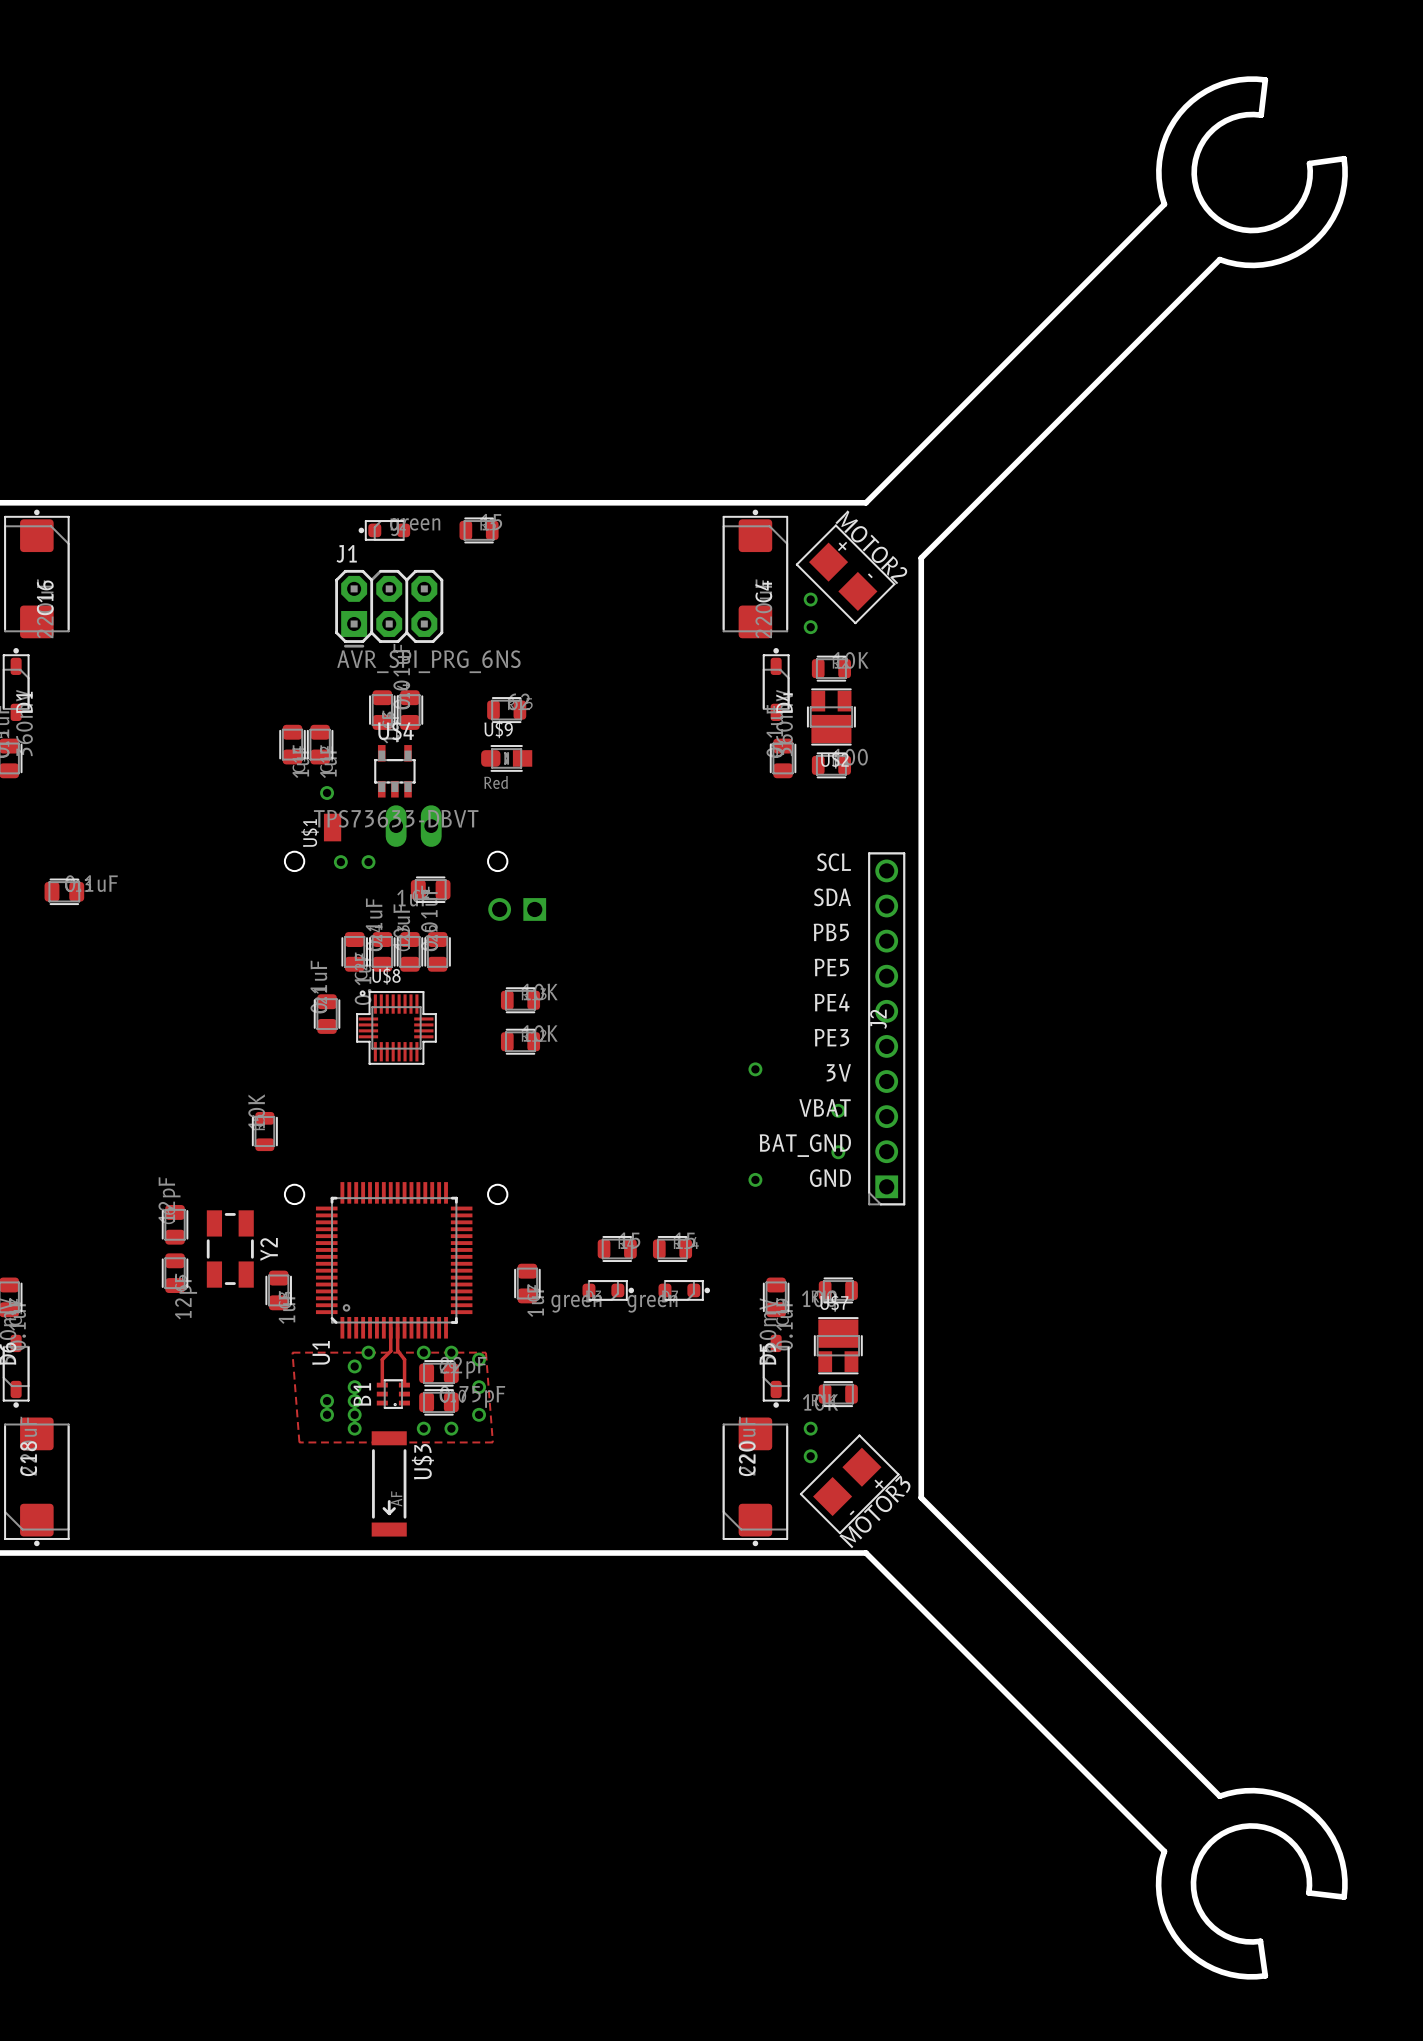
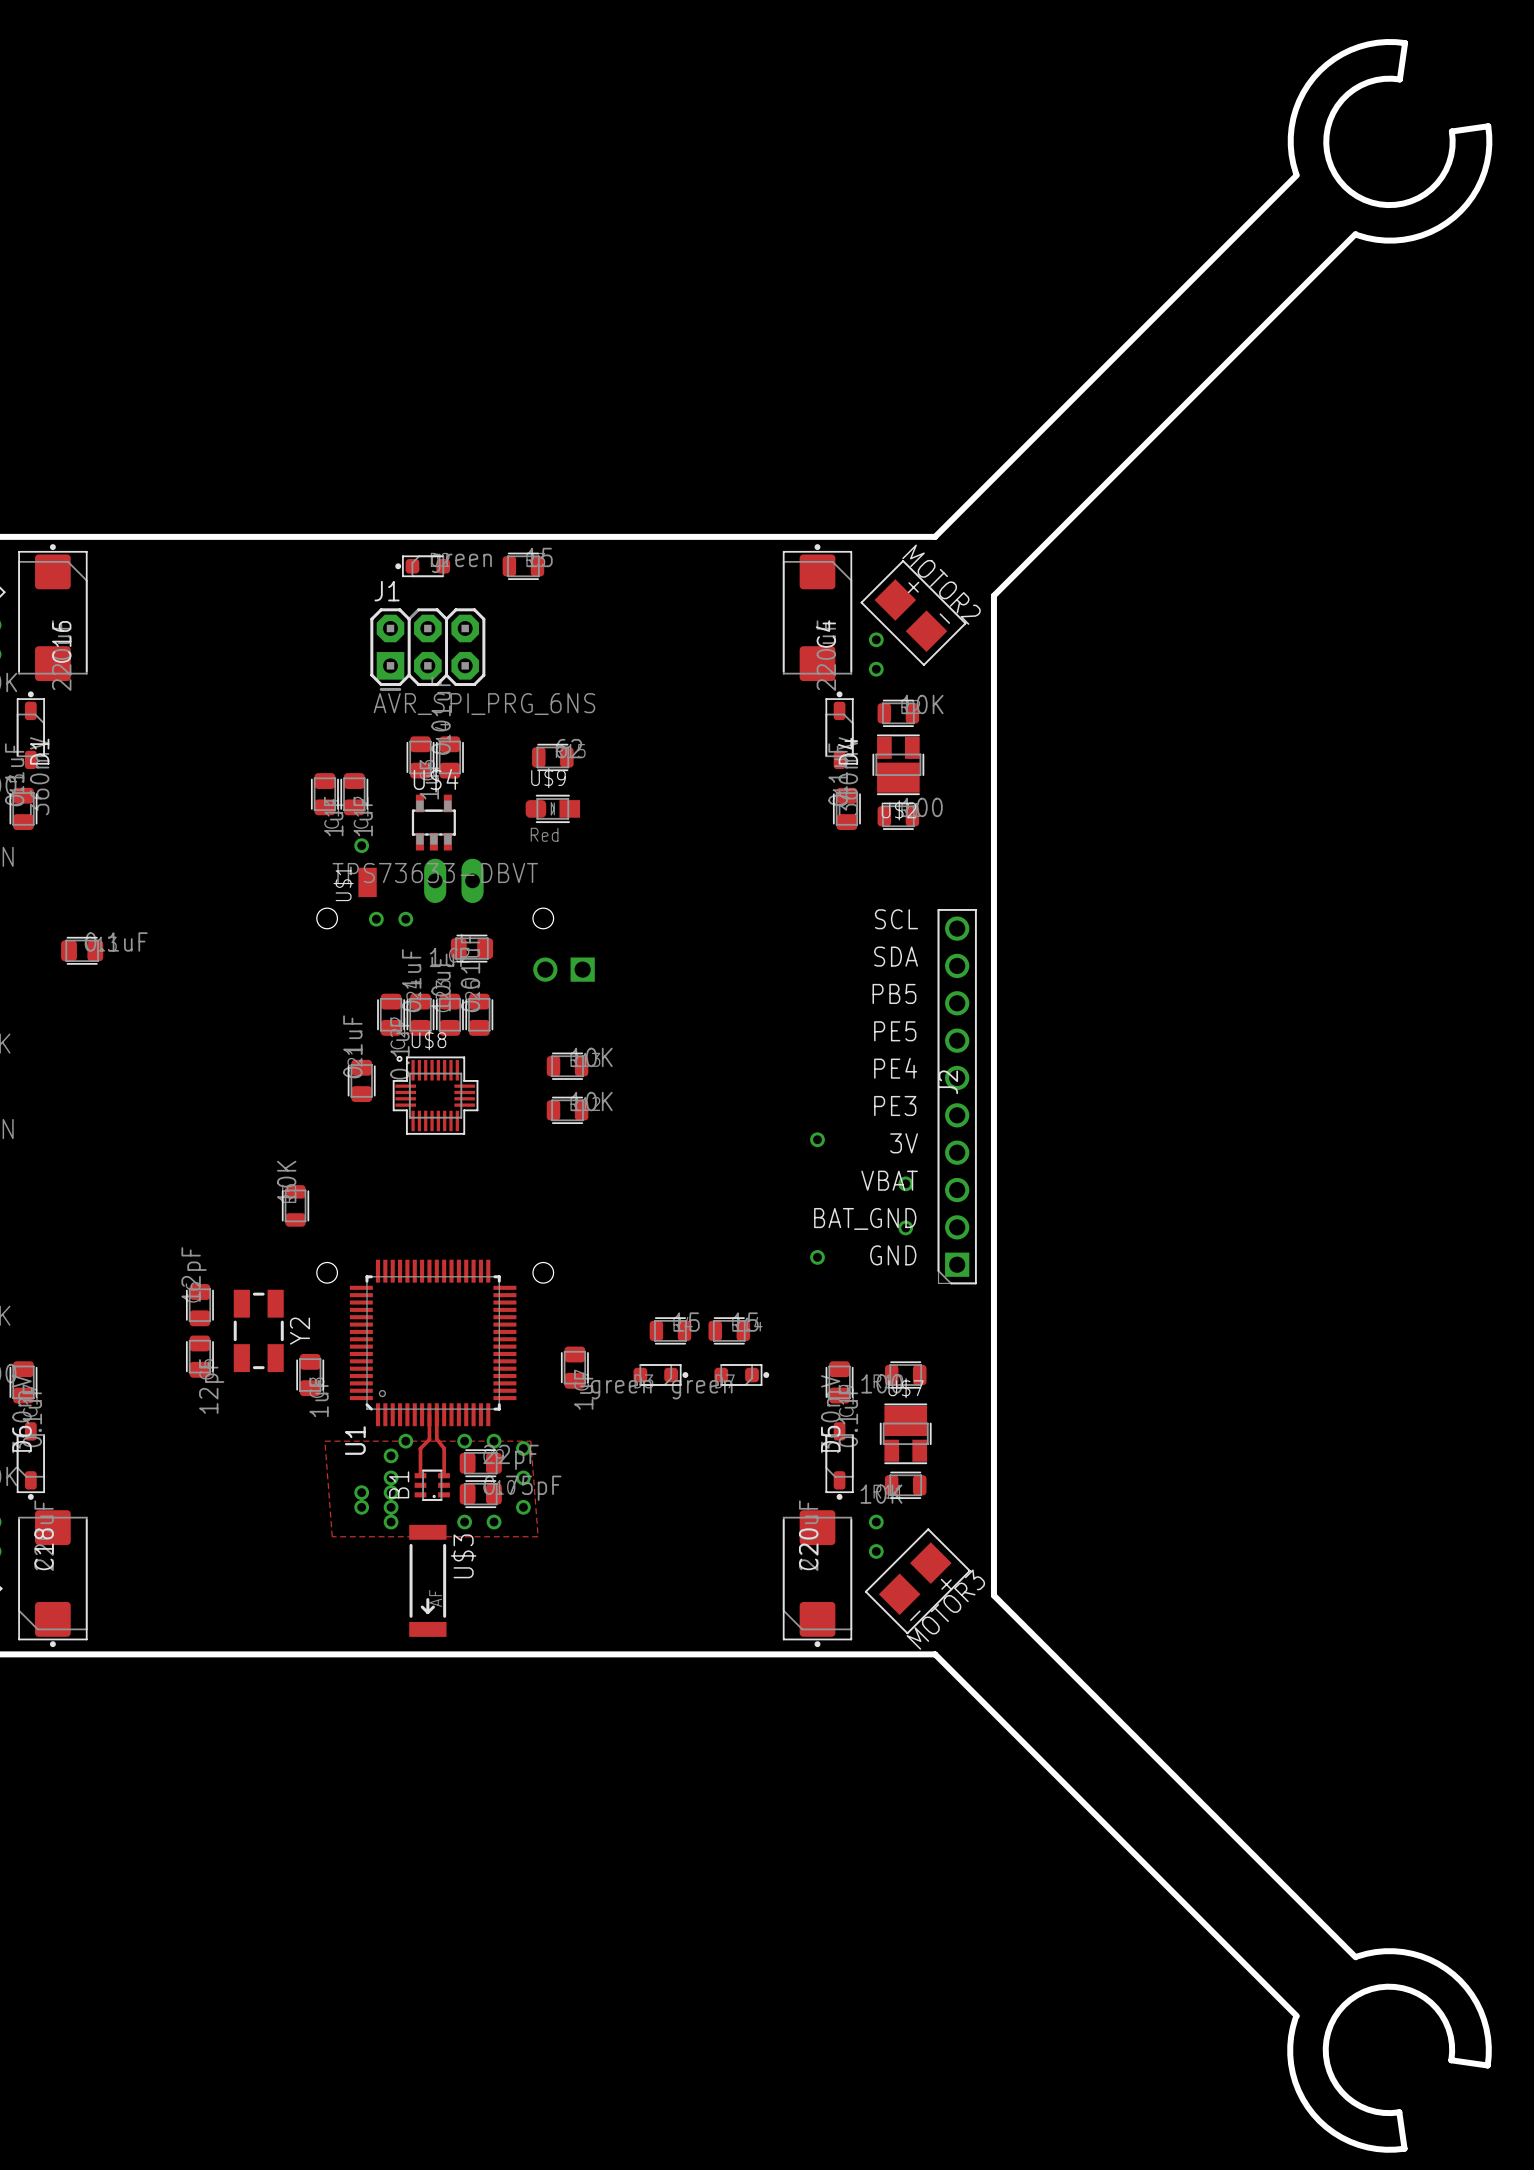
board edge: none -> (1295, 173) (1290, 145) (1293, 118) (1299, 100) (1313, 77) (1327, 64) (1350, 50) (1377, 42) (1405, 43) (1399, 79) (1383, 78) (1361, 85) (1347, 94) (1333, 112) (1327, 127) (1326, 143) (1331, 166) (1339, 180) (1357, 196) (1371, 202) (1395, 204) (1411, 201) (1431, 189) (1446, 170) (1452, 147) (1451, 131) (1488, 126) (1489, 144) (1487, 163) (1477, 188) (1466, 204) (1453, 217) (1438, 227) (1421, 235) (1403, 239) (1385, 240) (1358, 235)
board edge: (1164, 204) (1159, 178) (1160, 152) (1170, 128) (1179, 113) (1198, 95) (1214, 87) (1239, 79) (1265, 79) (1261, 115) (1239, 115) (1225, 120) (1208, 134) (1200, 146) (1195, 159) (1194, 174) (1198, 195) (1206, 208) (1222, 222) (1235, 228) (1250, 230) (1271, 227) (1290, 216) (1300, 205) (1308, 185) (1309, 163) (1344, 158) (1345, 176) (1342, 193) (1337, 210) (1328, 225) (1317, 238) (1296, 254) (1271, 263) (1254, 265) (1236, 264) (1219, 259) -> (1252, 219) (1296, 175)
board edge: none -> (1355, 233) (1311, 278)
board edge: (1219, 1796) (1236, 1791) (1254, 1790) (1271, 1792) (1295, 1801) (1310, 1811) (1328, 1830) (1336, 1845) (1342, 1862) (1344, 1879) (1344, 1897) (1308, 1892) (1308, 1871) (1299, 1851) (1289, 1840) (1271, 1829) (1249, 1825) (1228, 1830) (1210, 1842) (1201, 1854) (1195, 1867) (1193, 1882) (1194, 1896) (1199, 1910) (1207, 1922) (1225, 1935) (1238, 1940) (1260, 1941) (1265, 1975) (1239, 1976) (1213, 1968) (1198, 1960) (1179, 1942) (1165, 1919) (1159, 1894) (1159, 1868) (1164, 1851) -> (1311, 1913) (1355, 1957)
board edge: none -> (1357, 1956) (1384, 1951) (1412, 1953) (1429, 1959) (1453, 1974) (1466, 1987) (1480, 2011) (1488, 2037) (1487, 2065) (1451, 2060) (1451, 2044) (1445, 2021) (1436, 2008) (1417, 1993) (1402, 1988) (1387, 1986) (1363, 1991) (1350, 1999) (1334, 2017) (1328, 2032) (1326, 2056) (1329, 2071) (1341, 2091) (1360, 2106) (1383, 2112) (1399, 2112) (1404, 2148) (1386, 2149) (1367, 2147) (1341, 2137) (1326, 2127) (1313, 2114) (1302, 2099) (1295, 2082) (1291, 2064) (1290, 2045) (1295, 2018)
board edge: none -> (1252, 1971) (1296, 2016)

